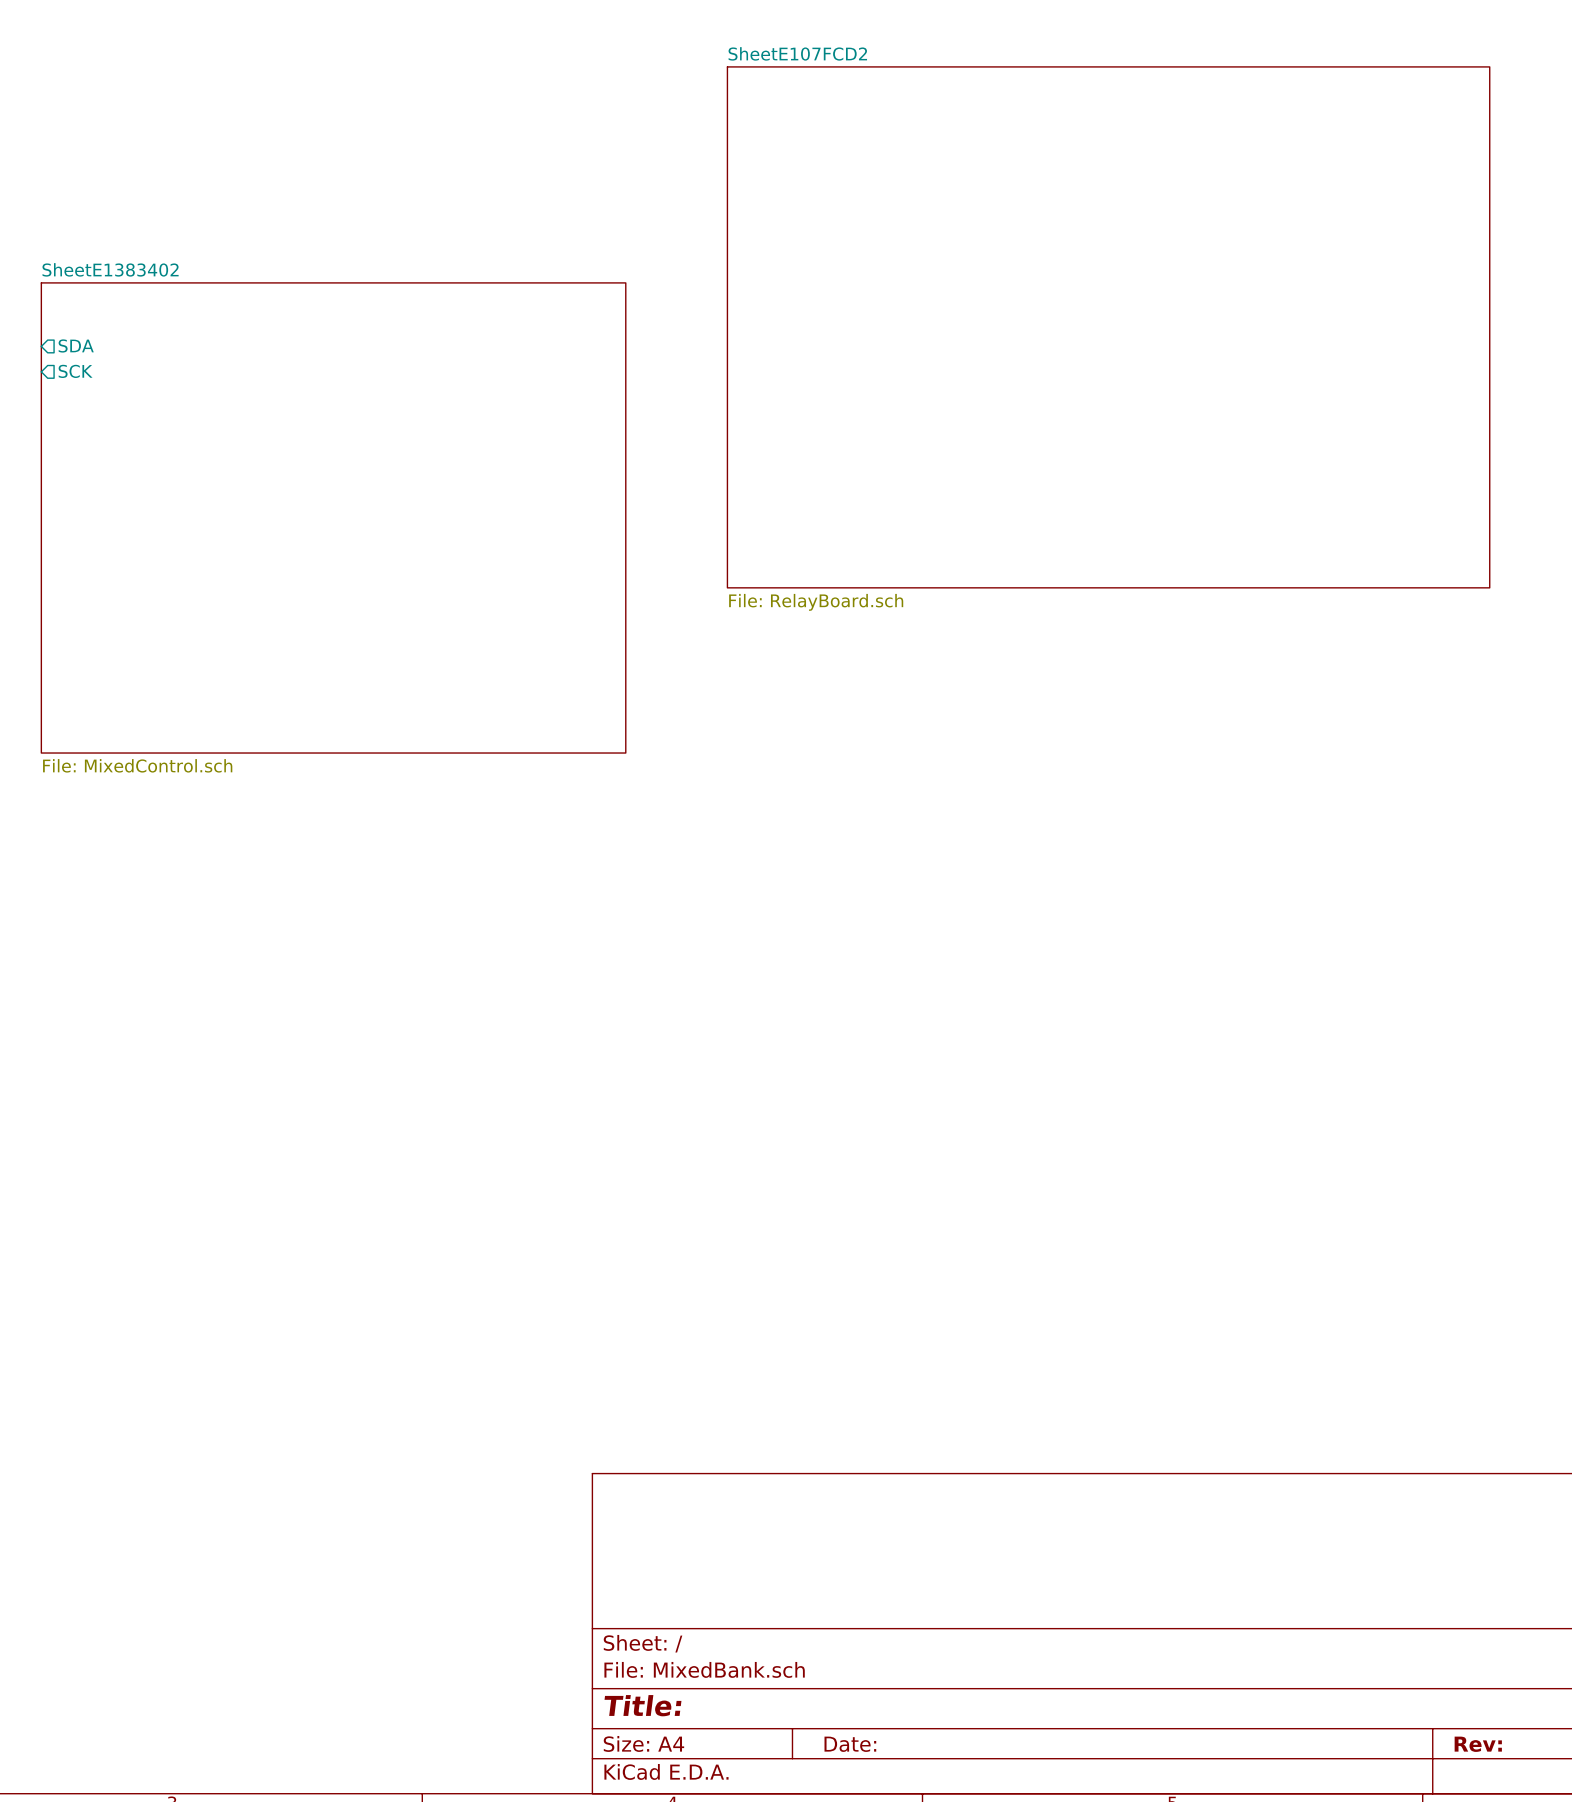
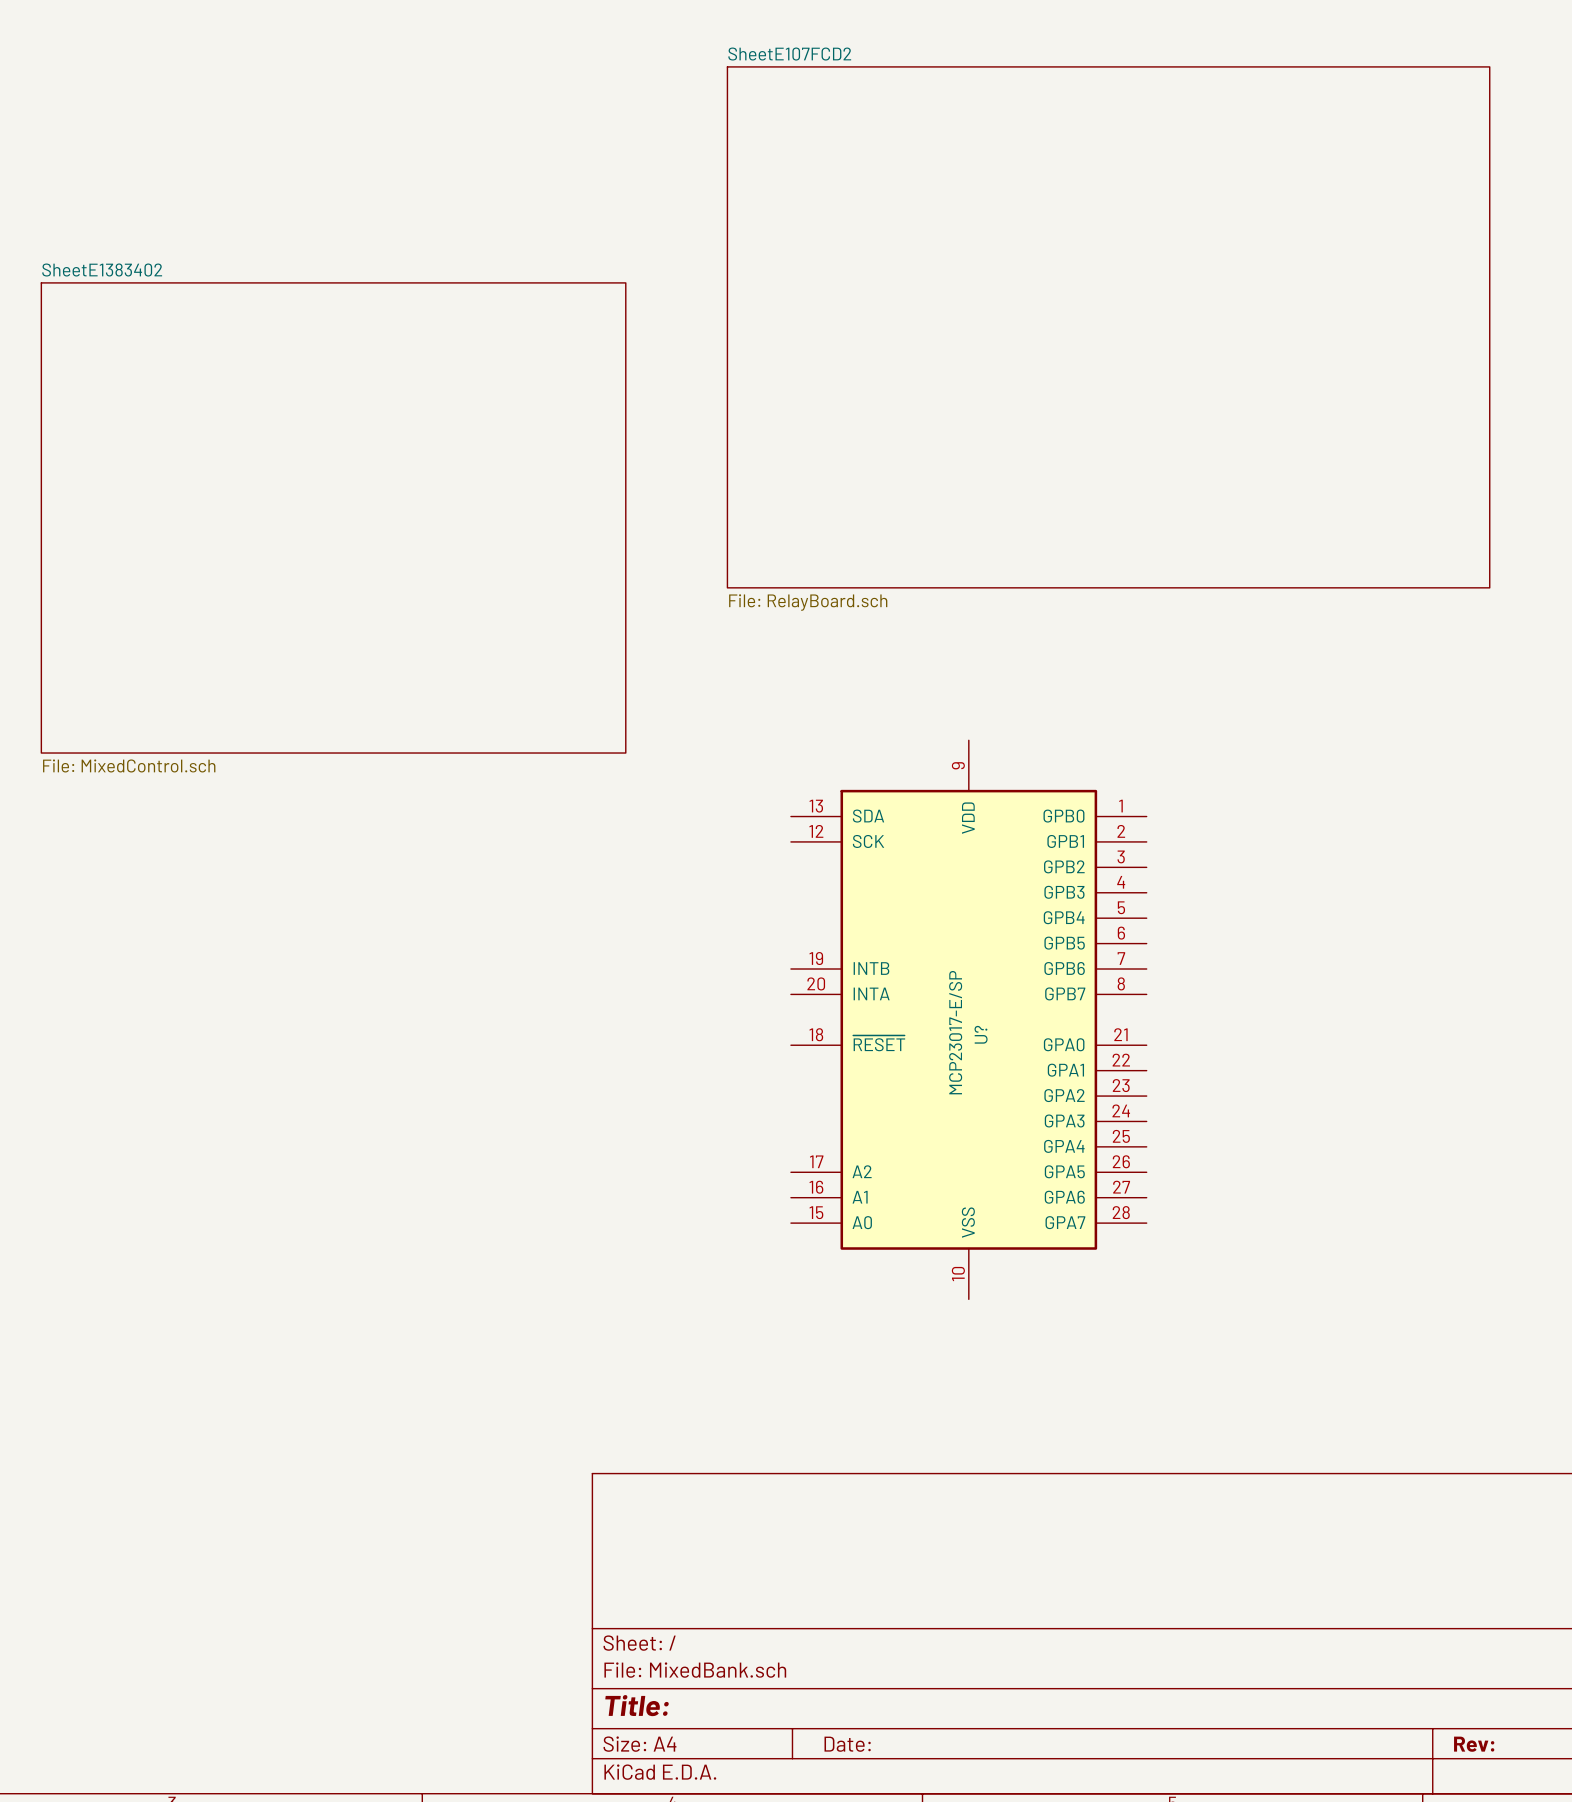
sheet pin: SDA (76, 345) -> none
sheet pin: SCK (75, 371) -> none
U?: none -> MCP23017-E/SP (968, 1019)

